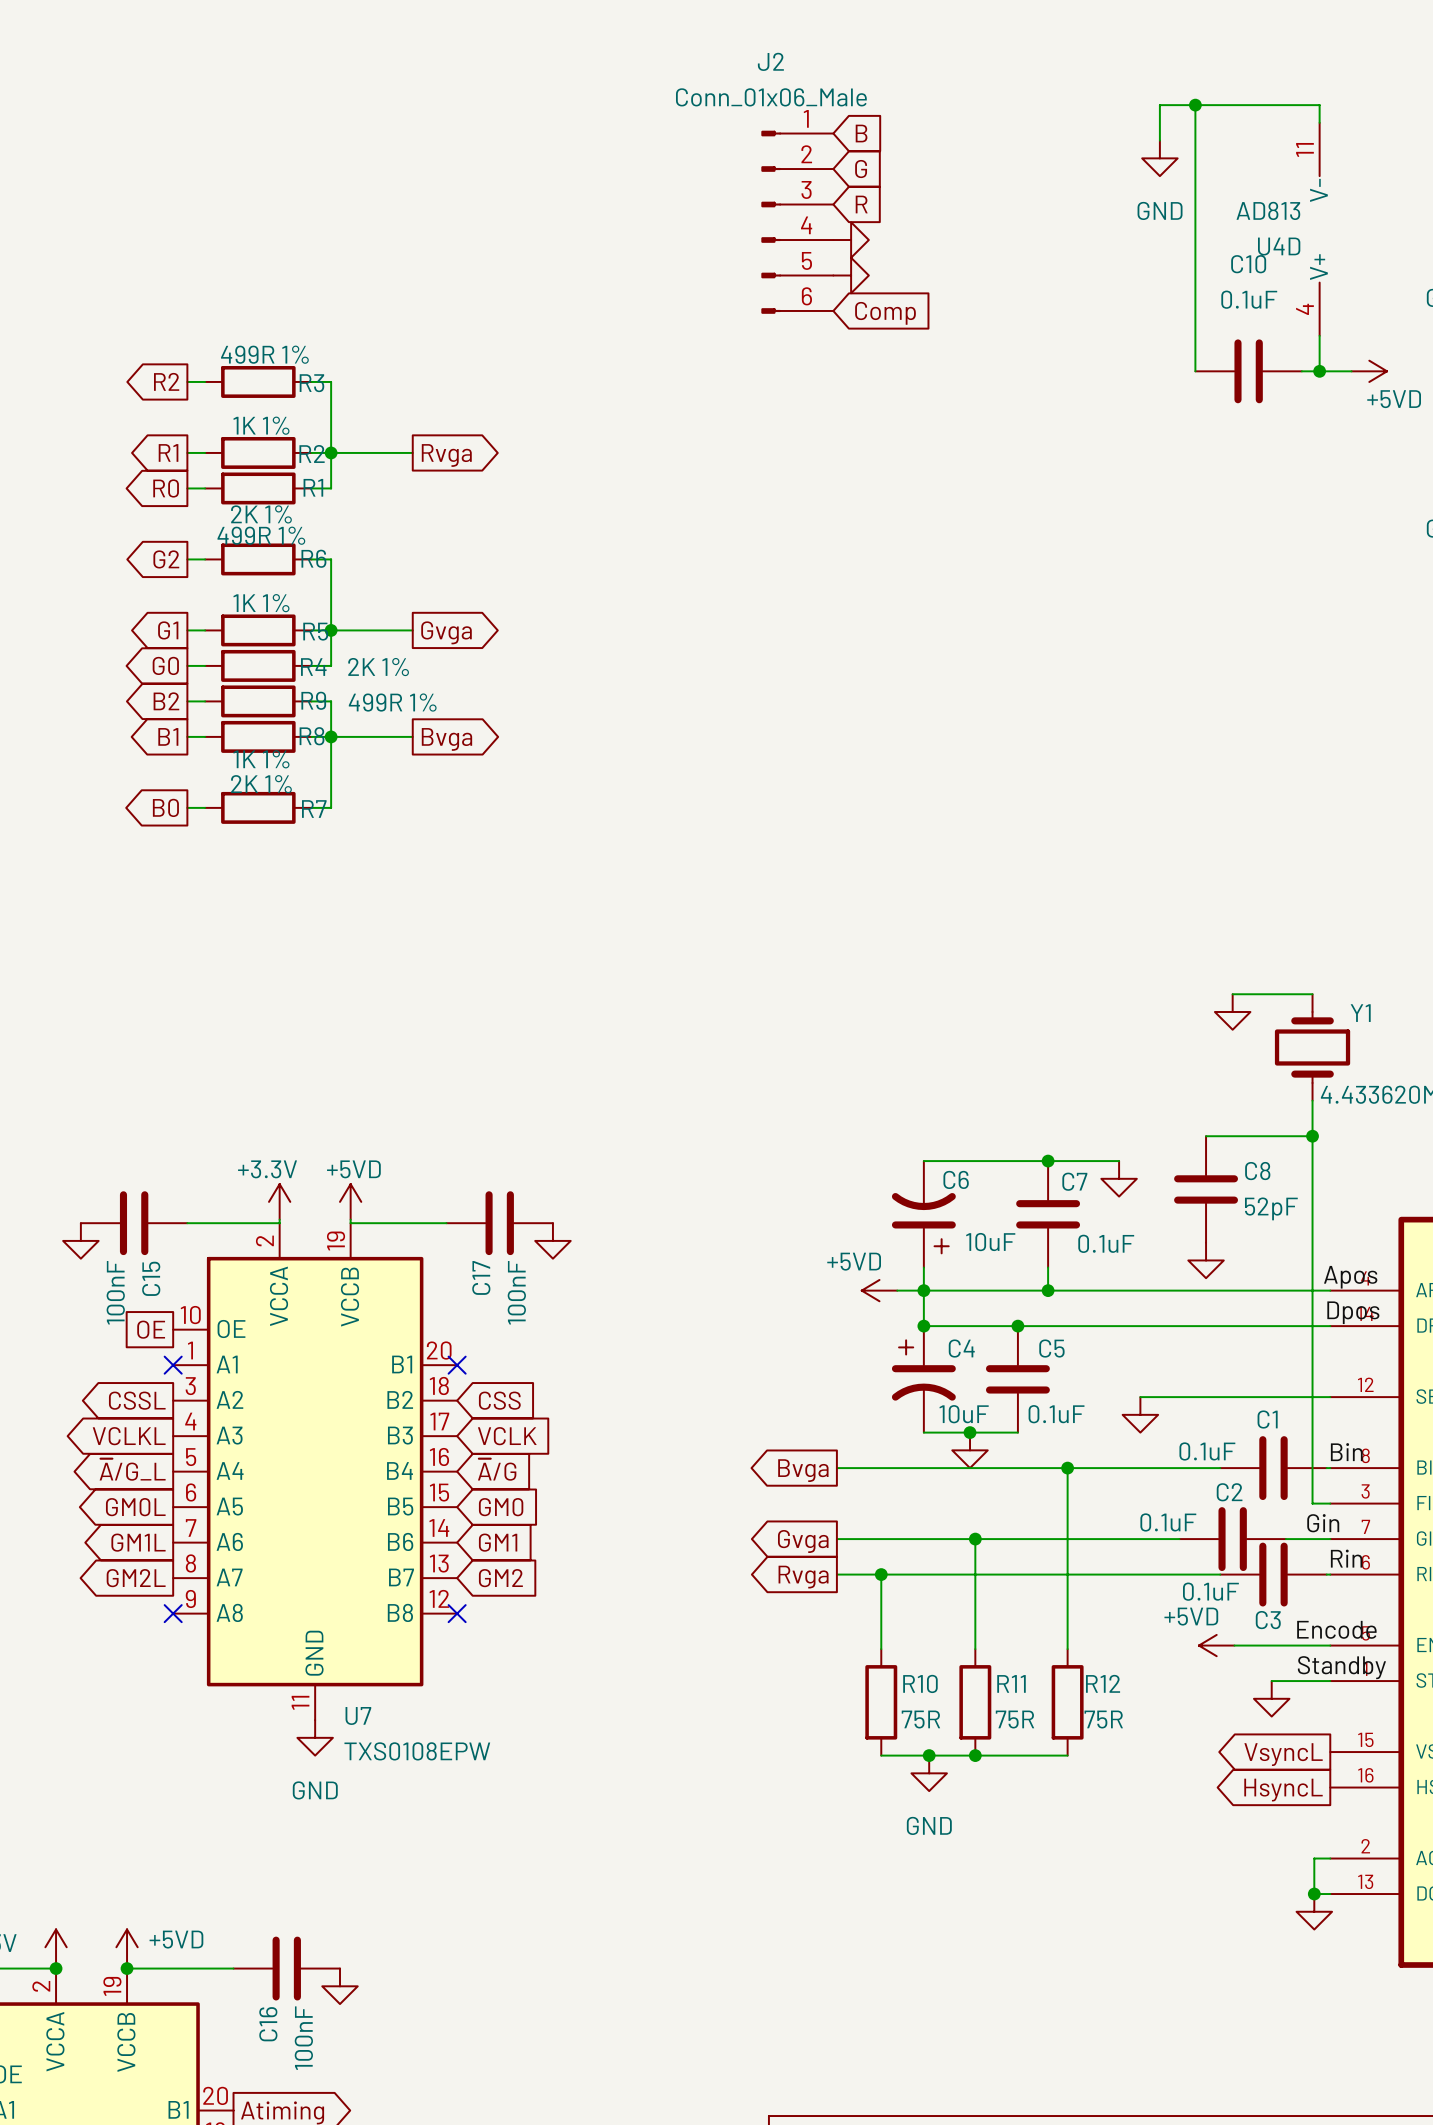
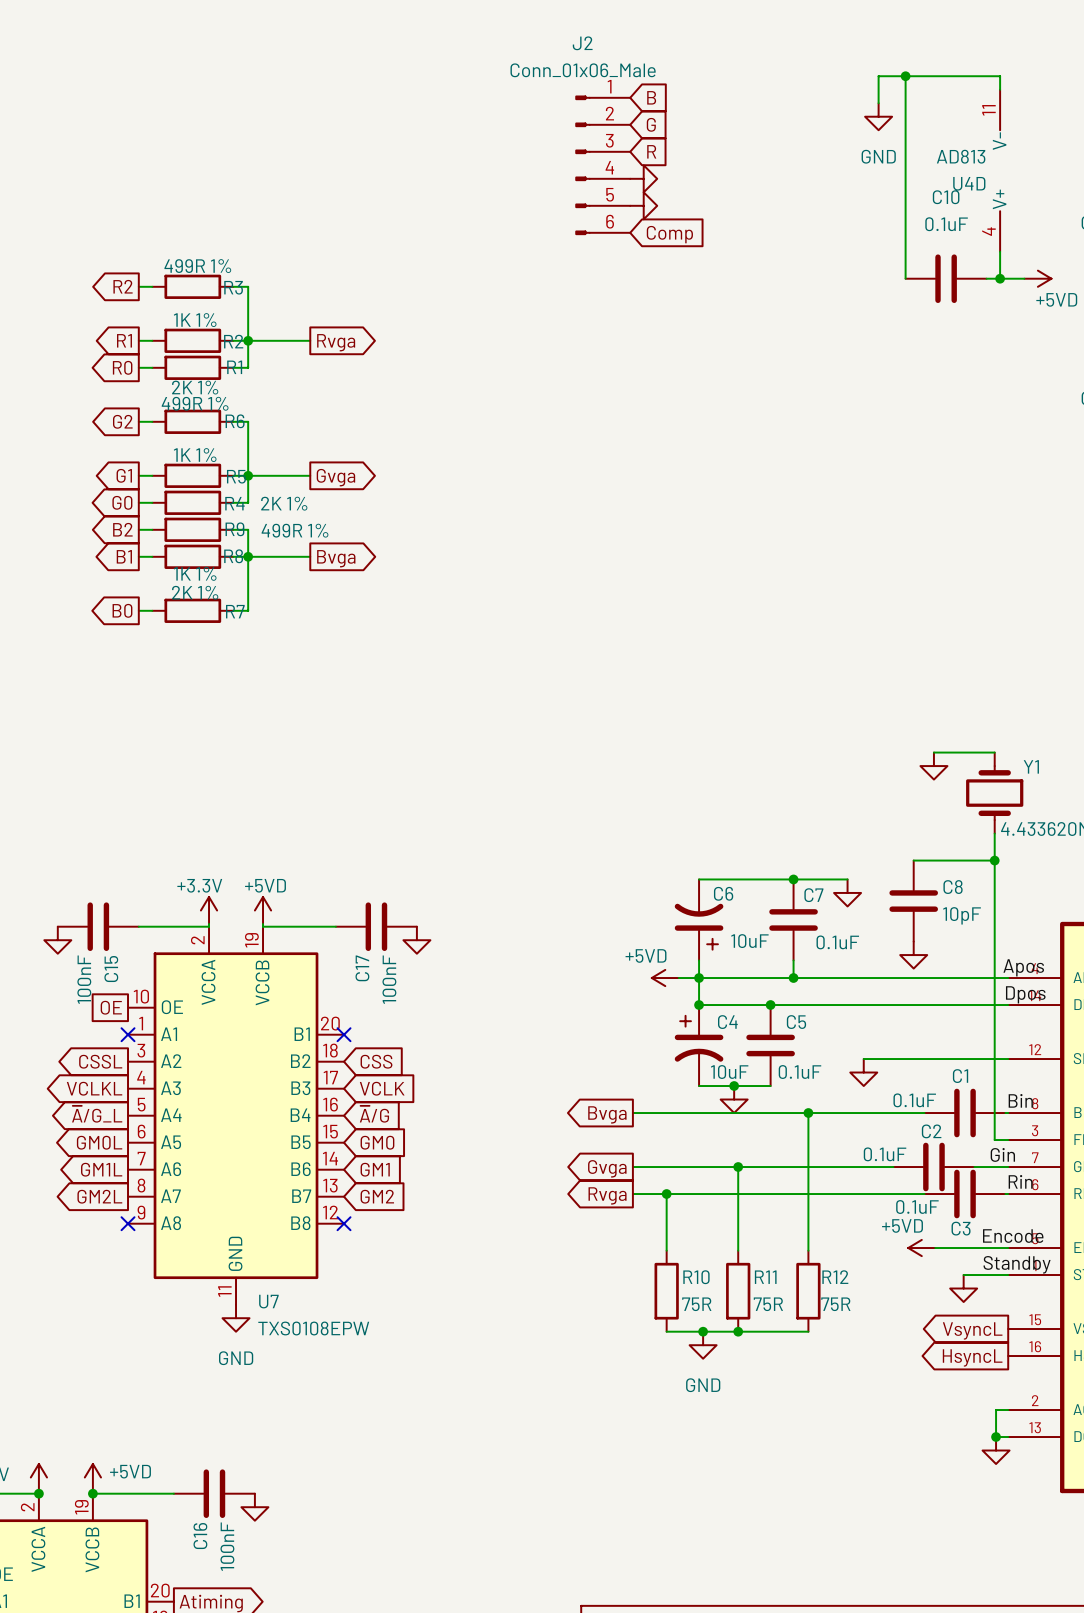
C8 value: 52pF (1271, 1208) -> 10pF (962, 915)

